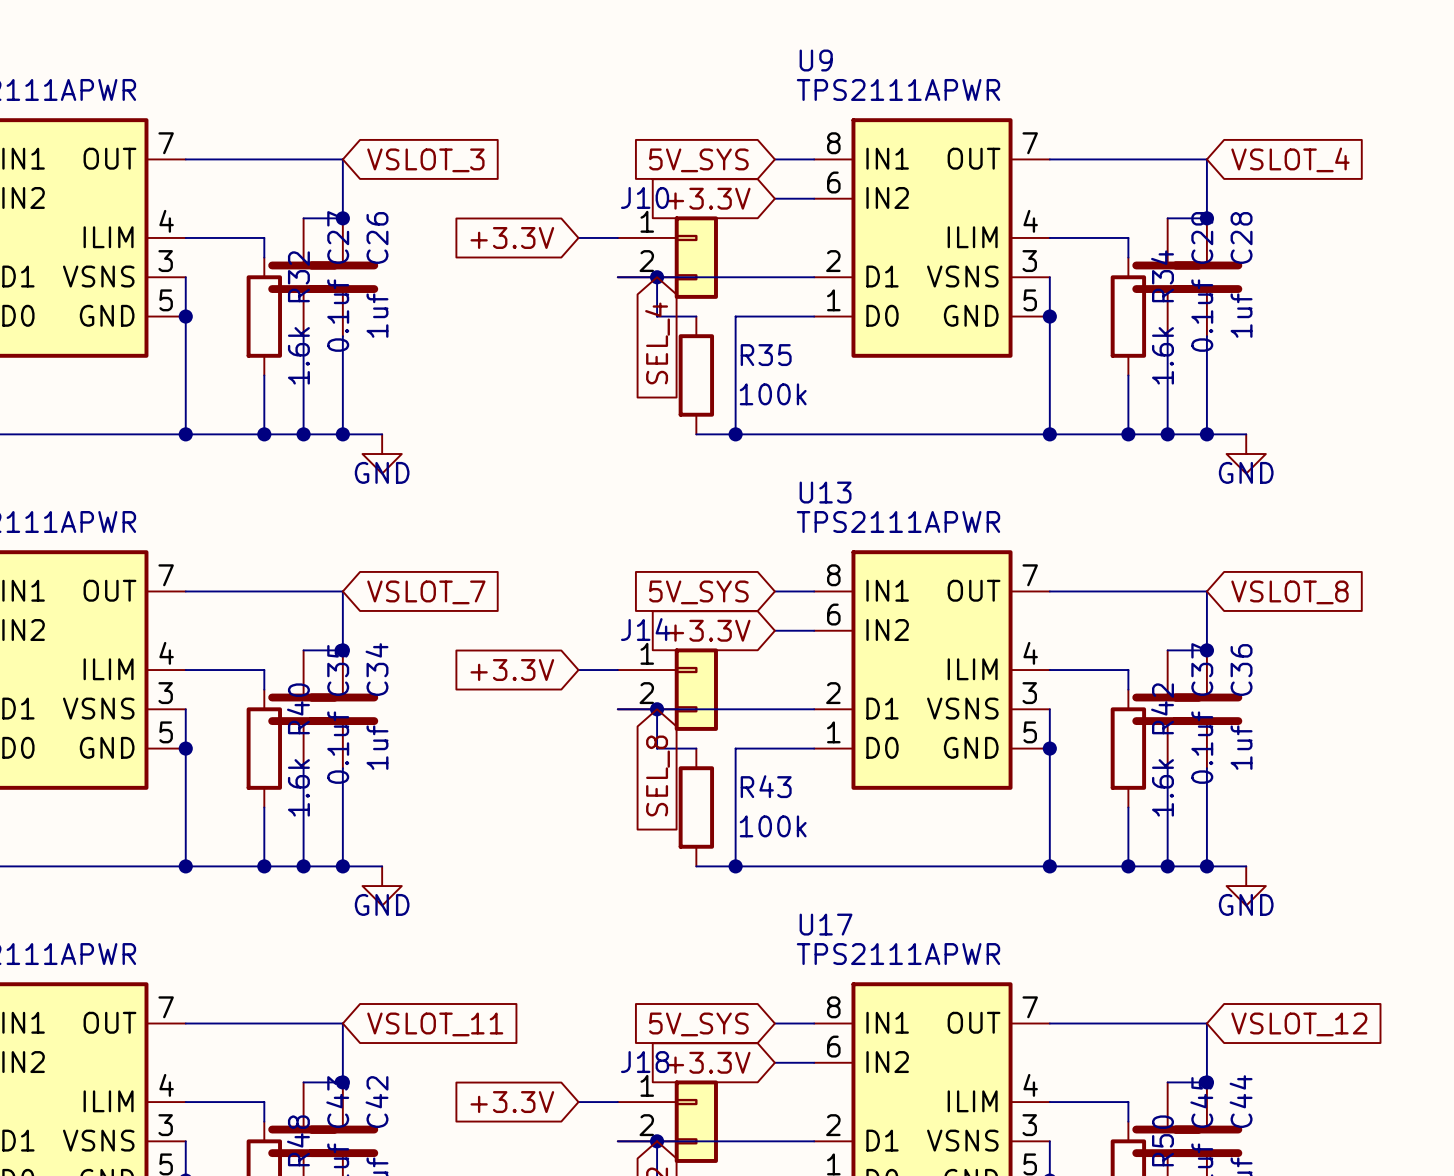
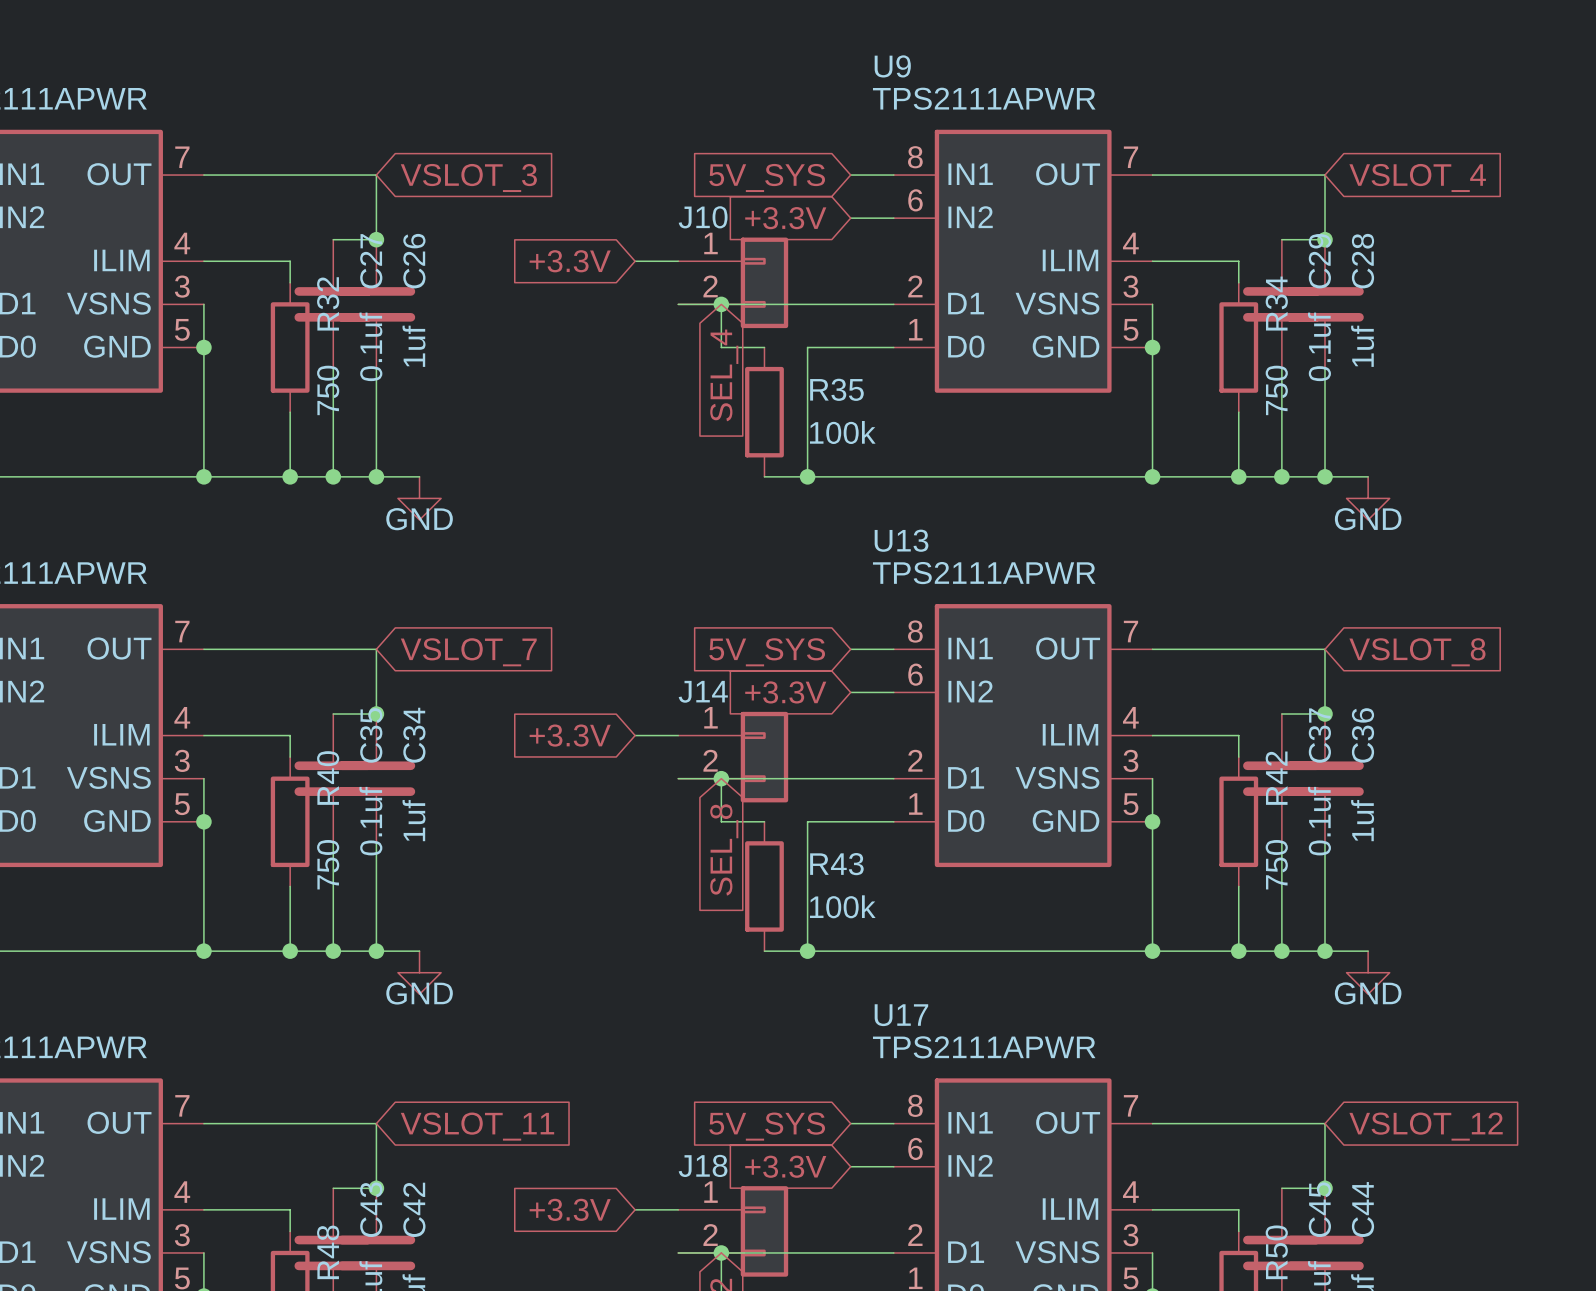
R32 value: 1.6k (298, 355) -> 750 (328, 390)
R34 value: 1.6k (1163, 355) -> 750 (1276, 390)
R40 value: 1.6k (298, 787) -> 750 (328, 864)
R42 value: 1.6k (1163, 787) -> 750 (1276, 864)

